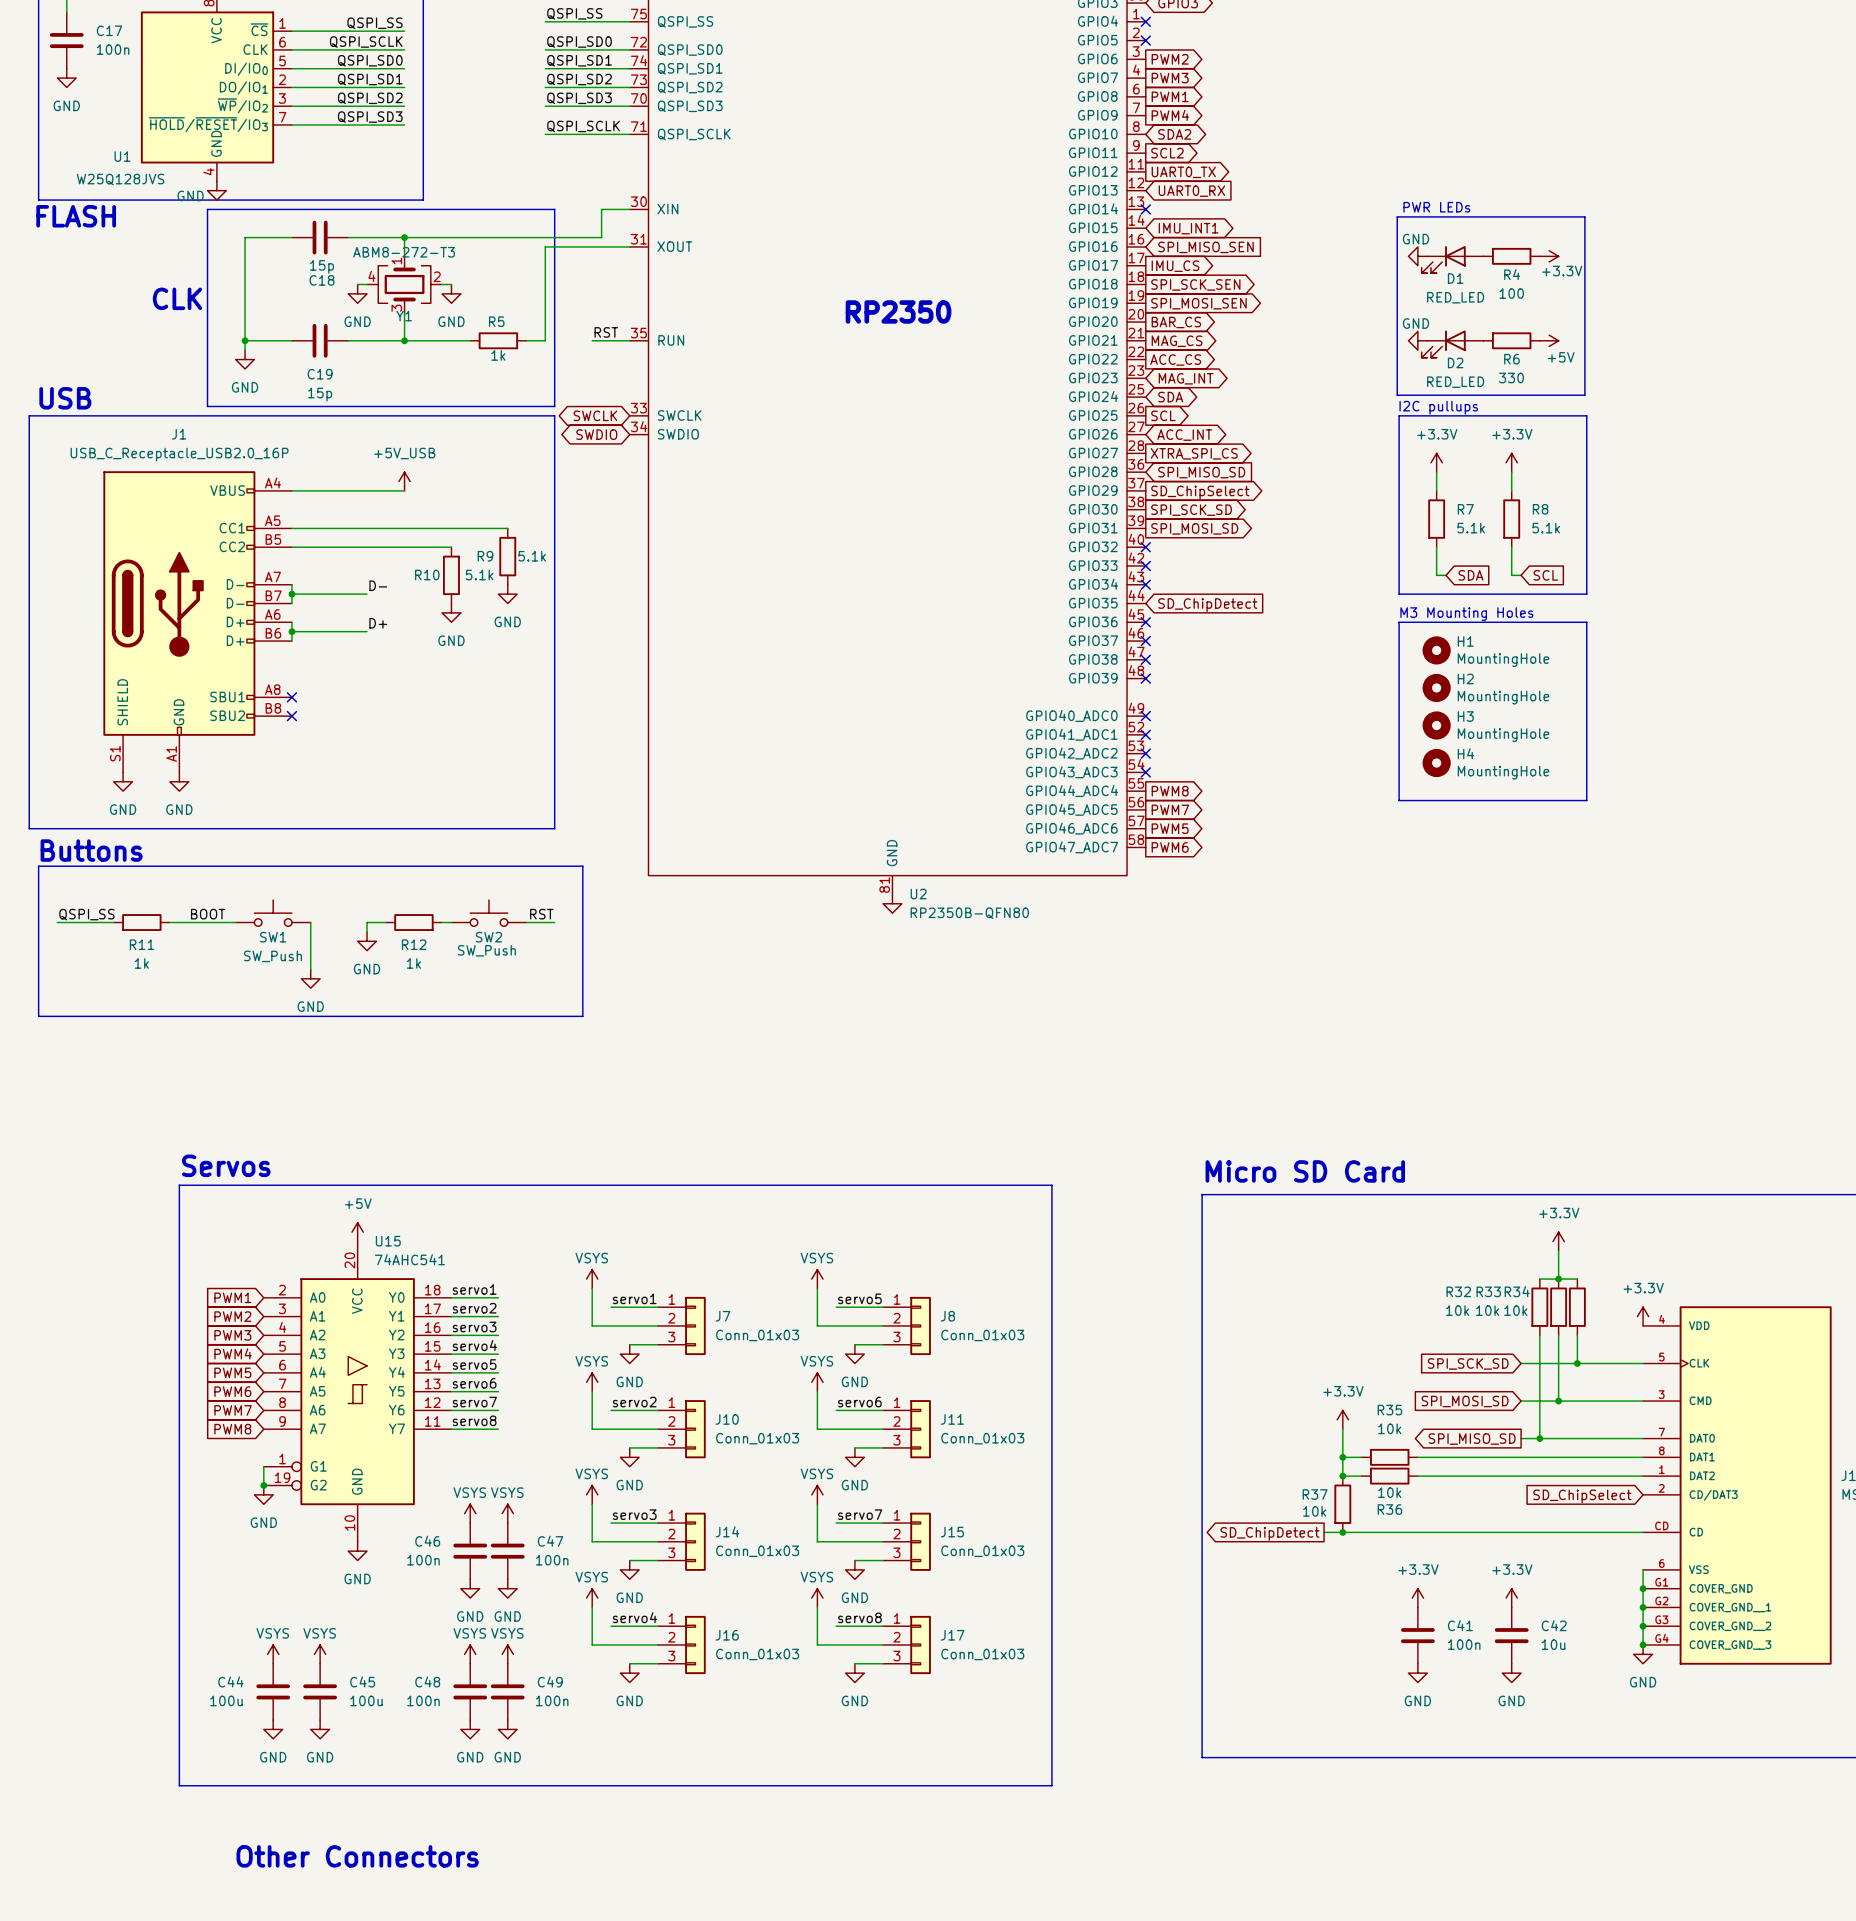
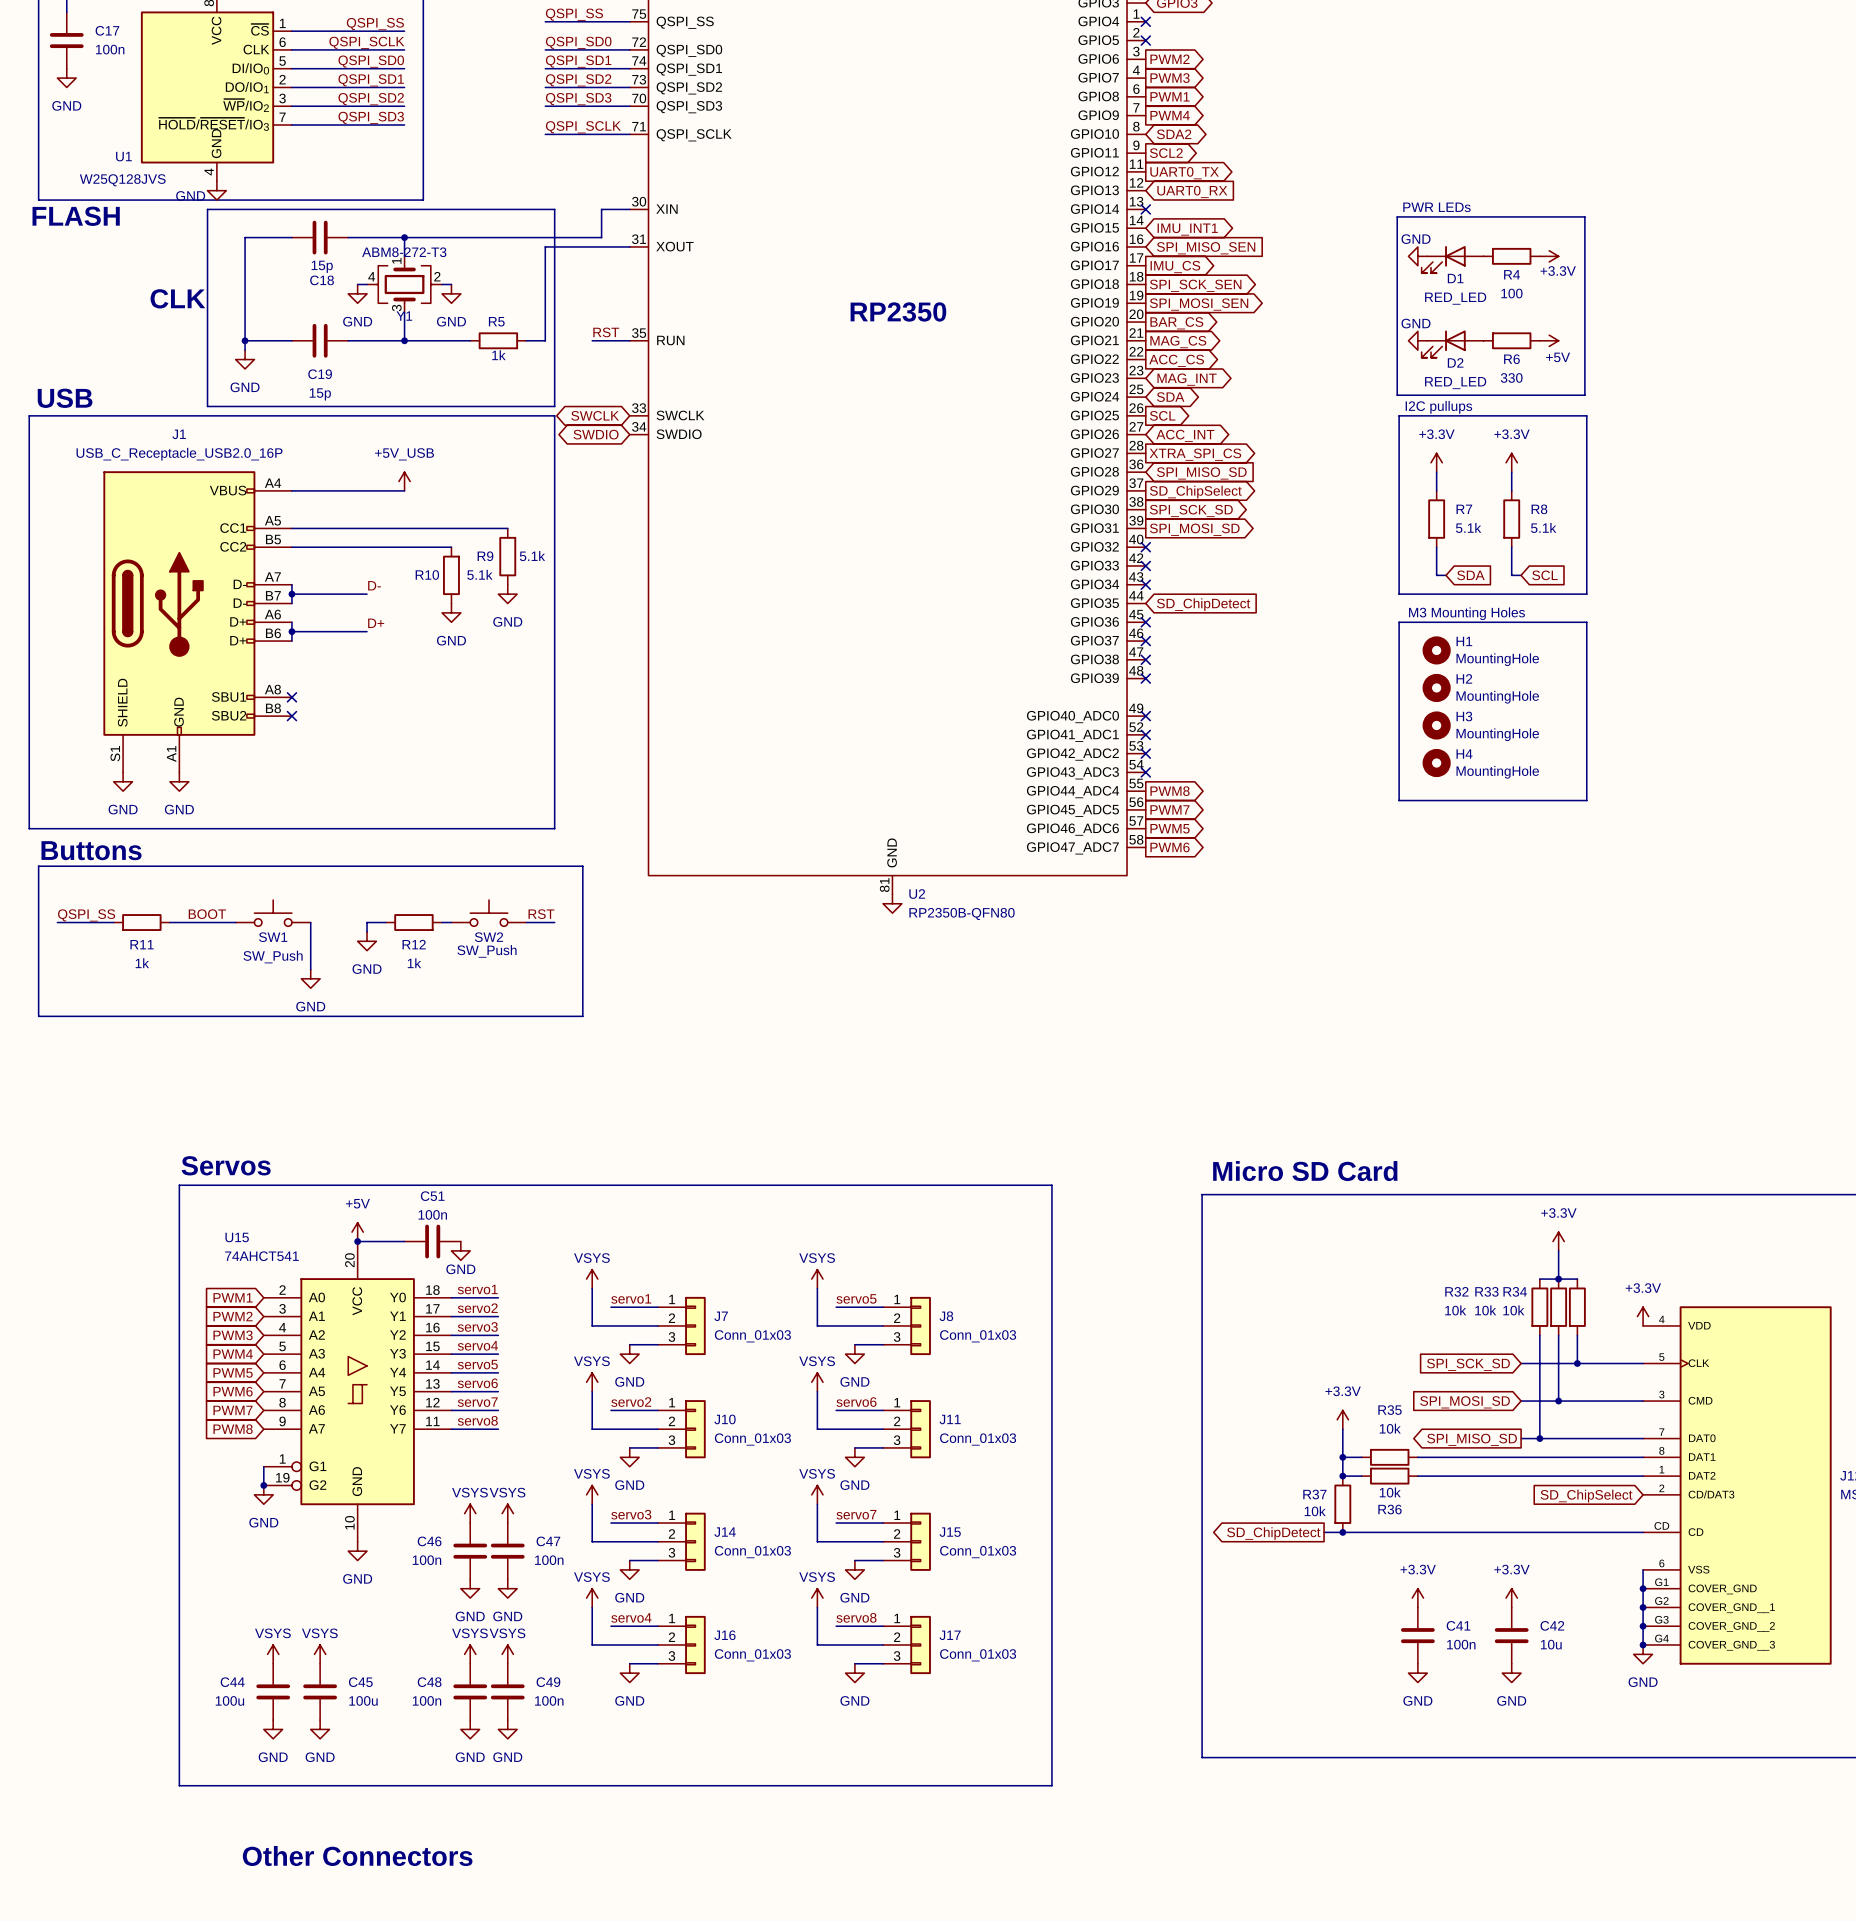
wire: none -> (357, 1241) (404, 1241)
junction: none -> (357, 1241)
U15 name position: U15 (388, 1241) -> U15 (237, 1237)
C51: none -> 100n (432, 1241)
power symbol: none -> GND (460, 1250)
U15 value: 74AHC541 (409, 1259) -> 74AHCT541 (261, 1256)

